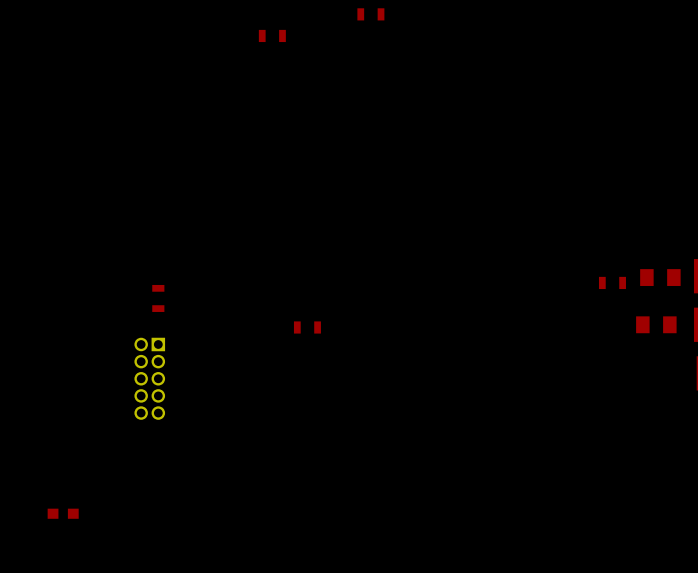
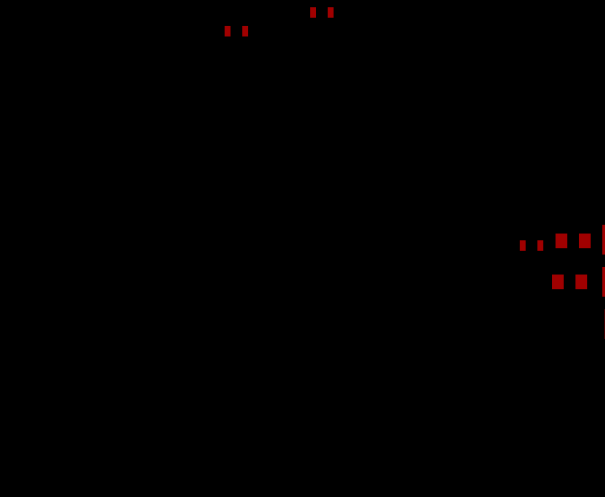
part: (158, 298) -> none
part: (307, 327) -> none
part: (149, 378) -> none
part: (63, 513) -> none

